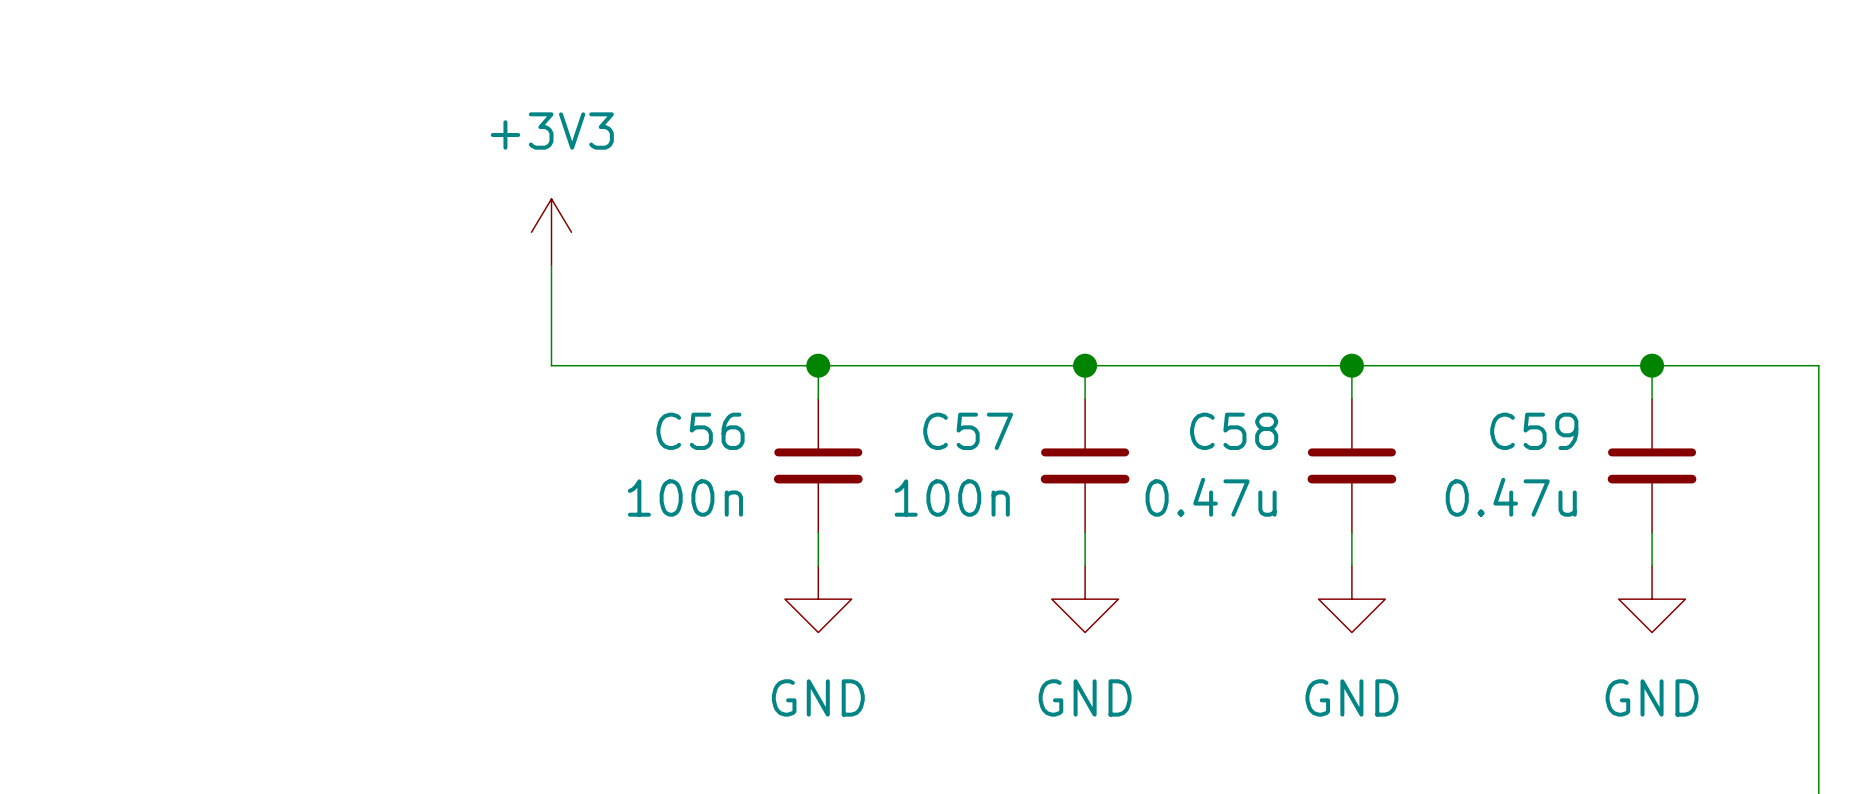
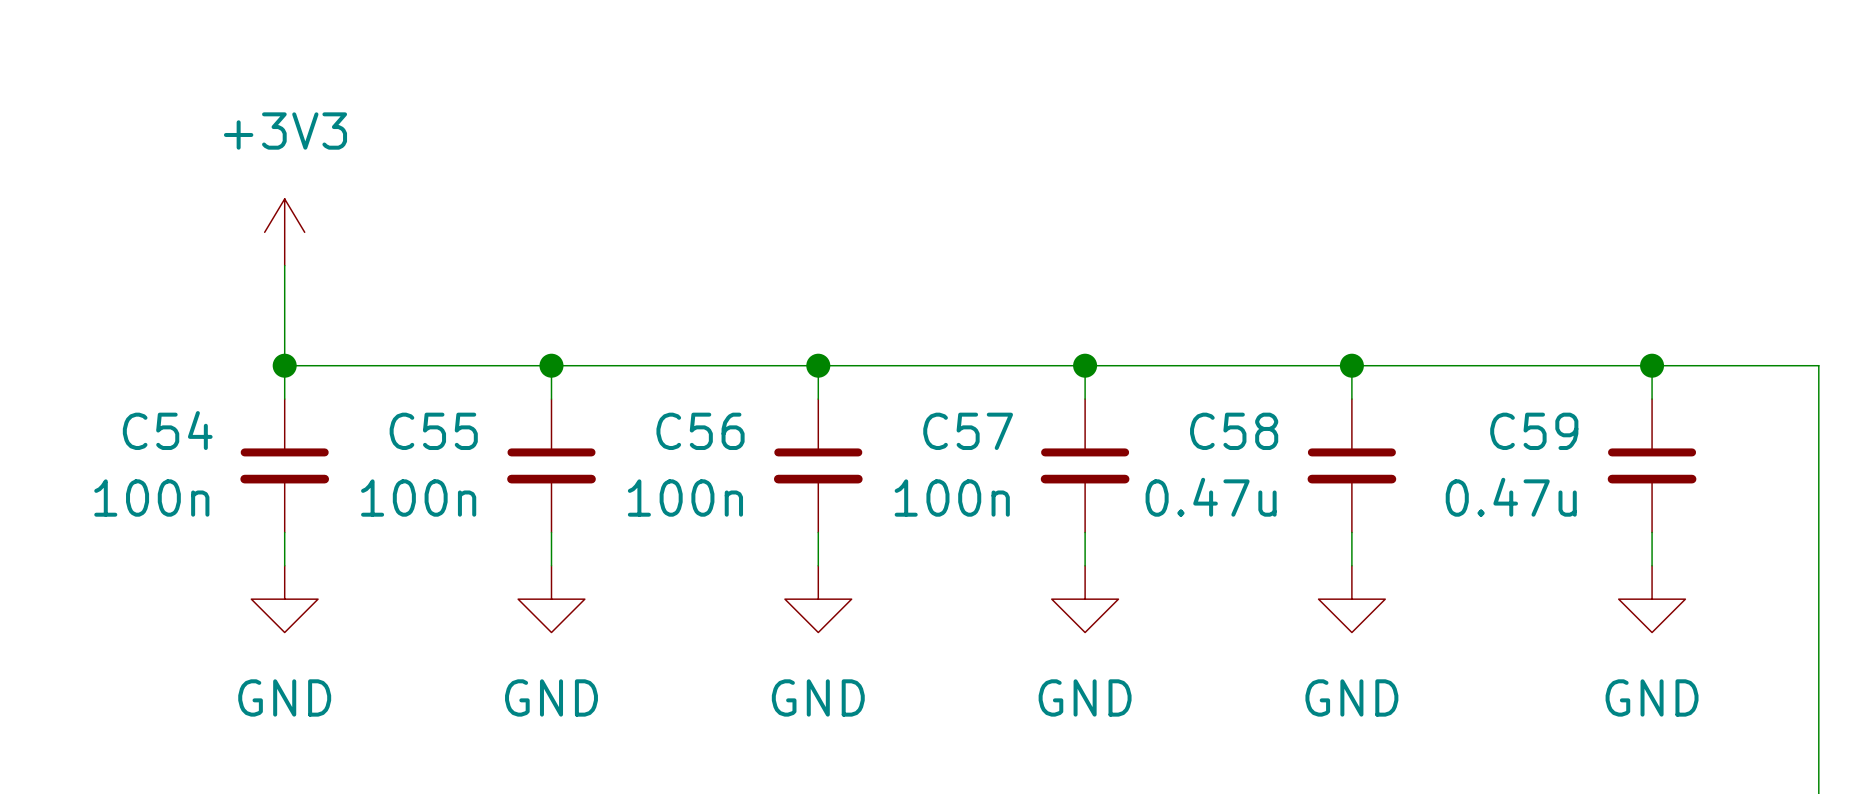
power symbol position: +3V3 (551, 232) -> +3V3 (284, 232)
wire: none -> (284, 265) (284, 399)
wire: (551, 265) (551, 365) -> none
wire: none -> (284, 365) (551, 365) (551, 399)
junction: none -> (284, 365)
junction: none -> (551, 365)
C54: none -> 100n (284, 465)
C55: none -> 100n (551, 465)
wire: none -> (284, 532) (284, 565)
wire: none -> (551, 532) (551, 565)
power symbol: none -> GND (284, 599)
power symbol: none -> GND (551, 599)

